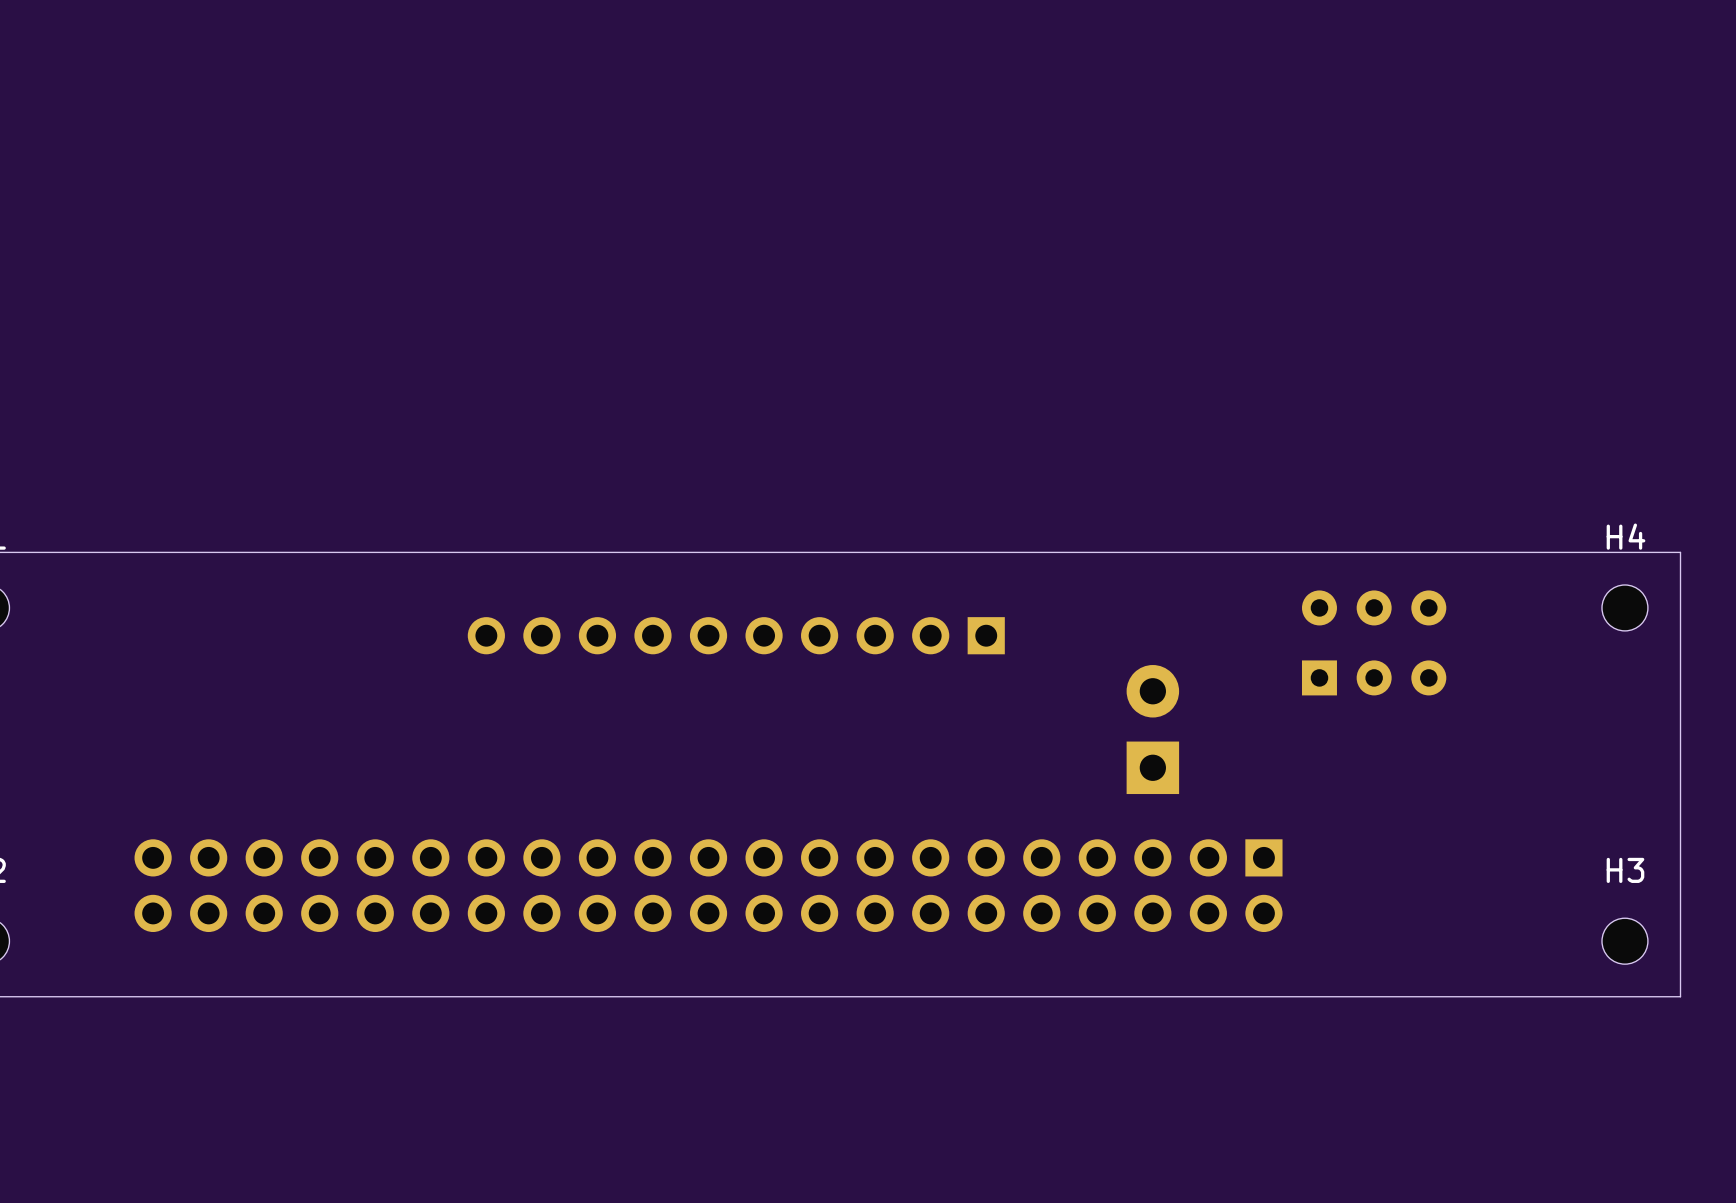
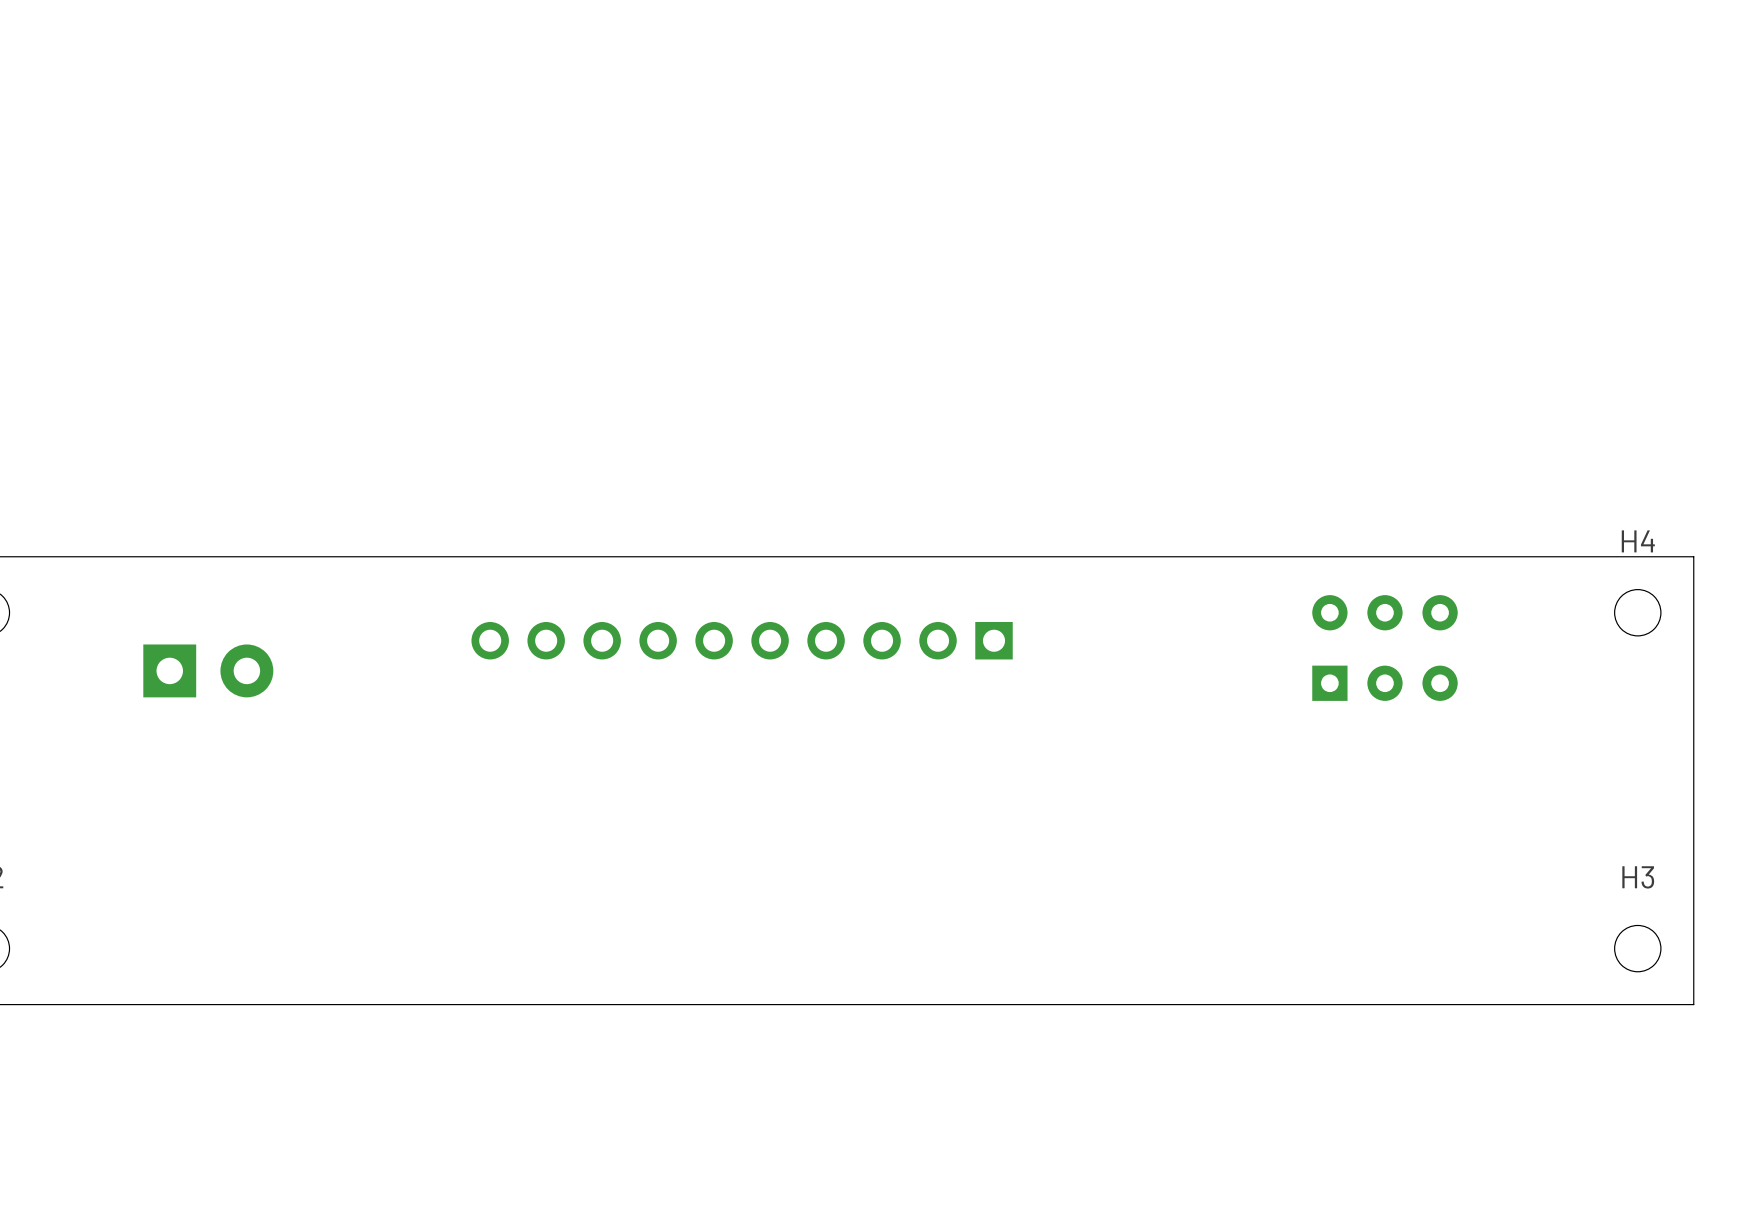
part: none -> (208, 670)
part: (1152, 729) -> none
part: (708, 885) -> none

